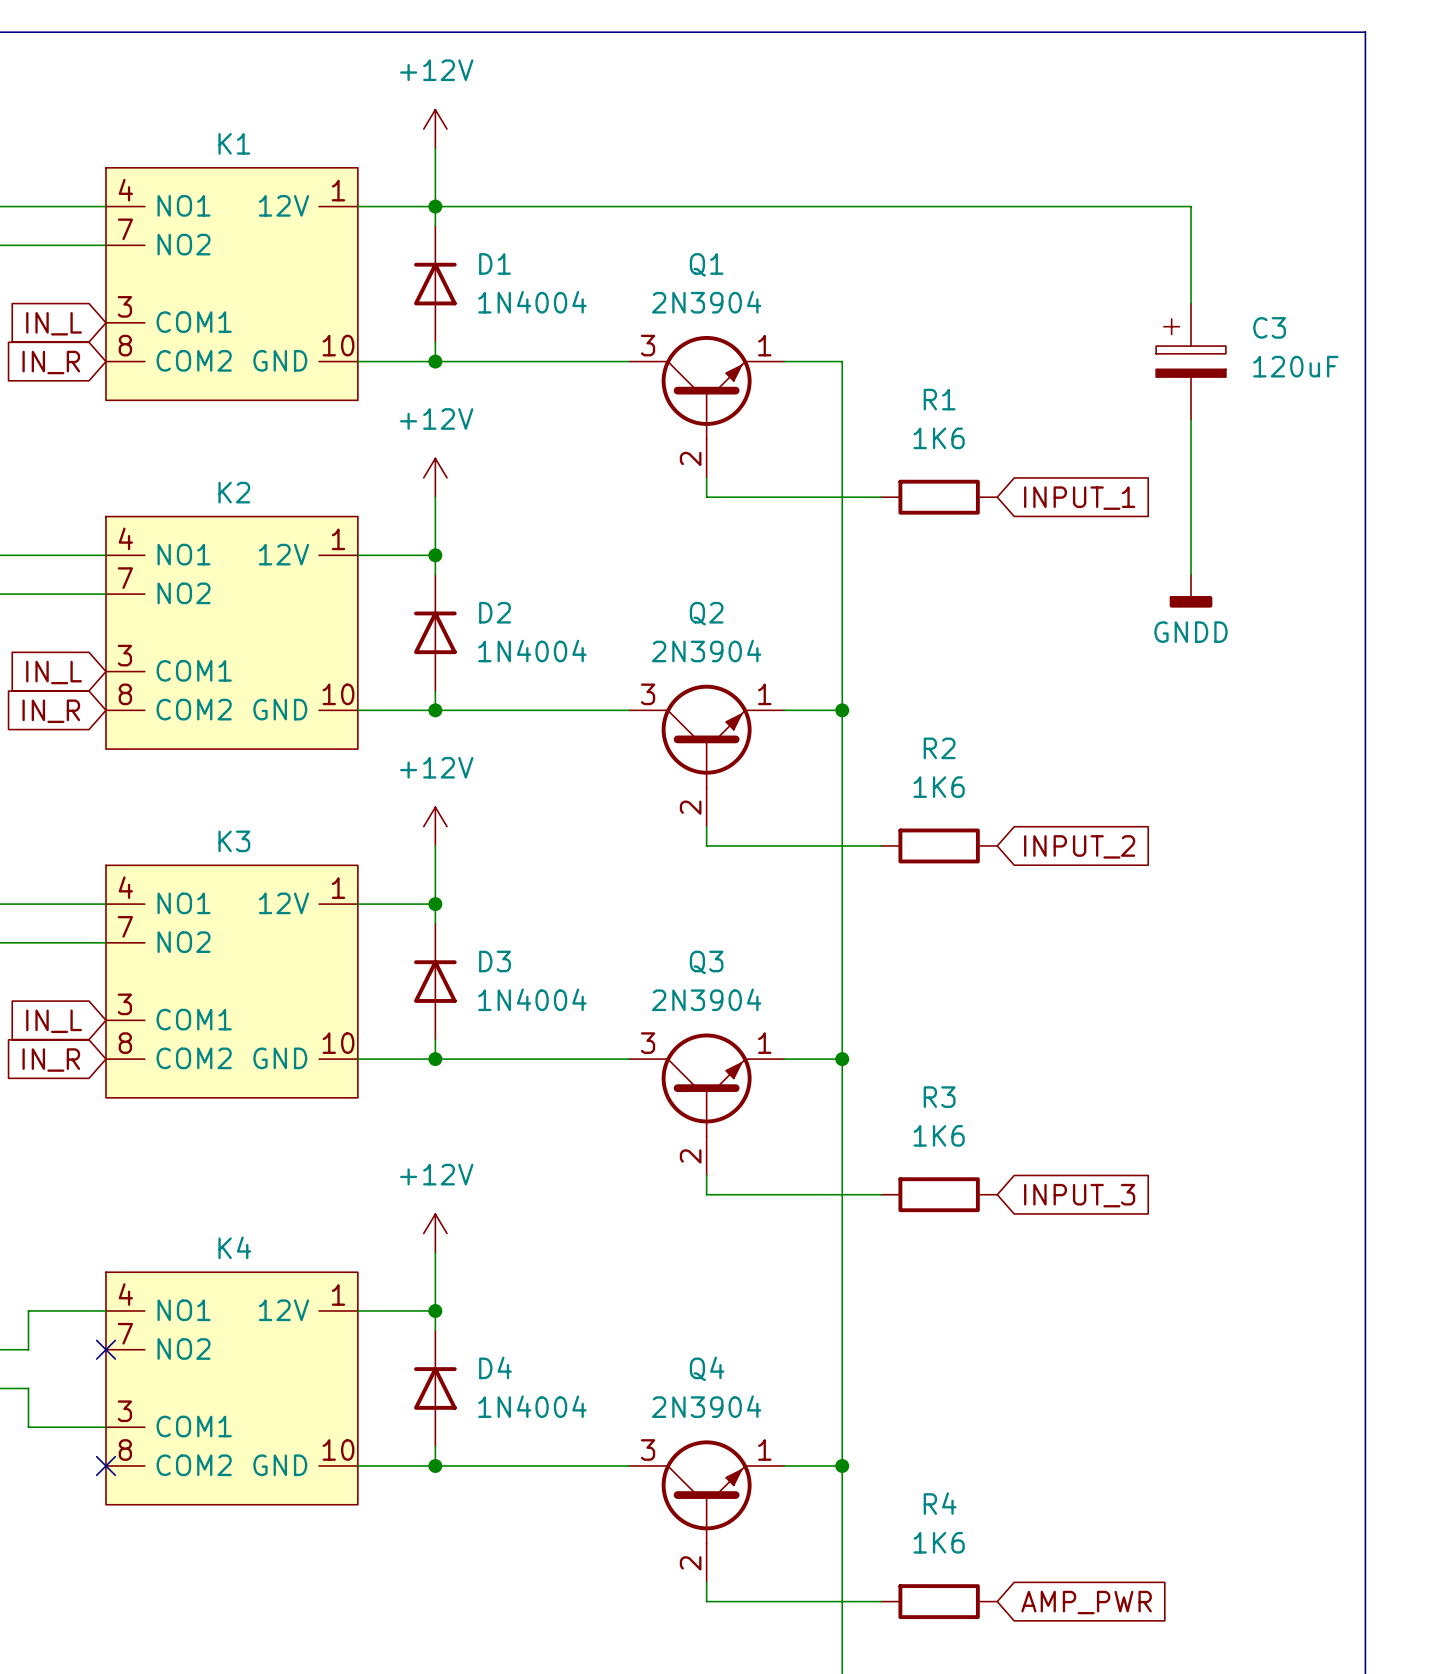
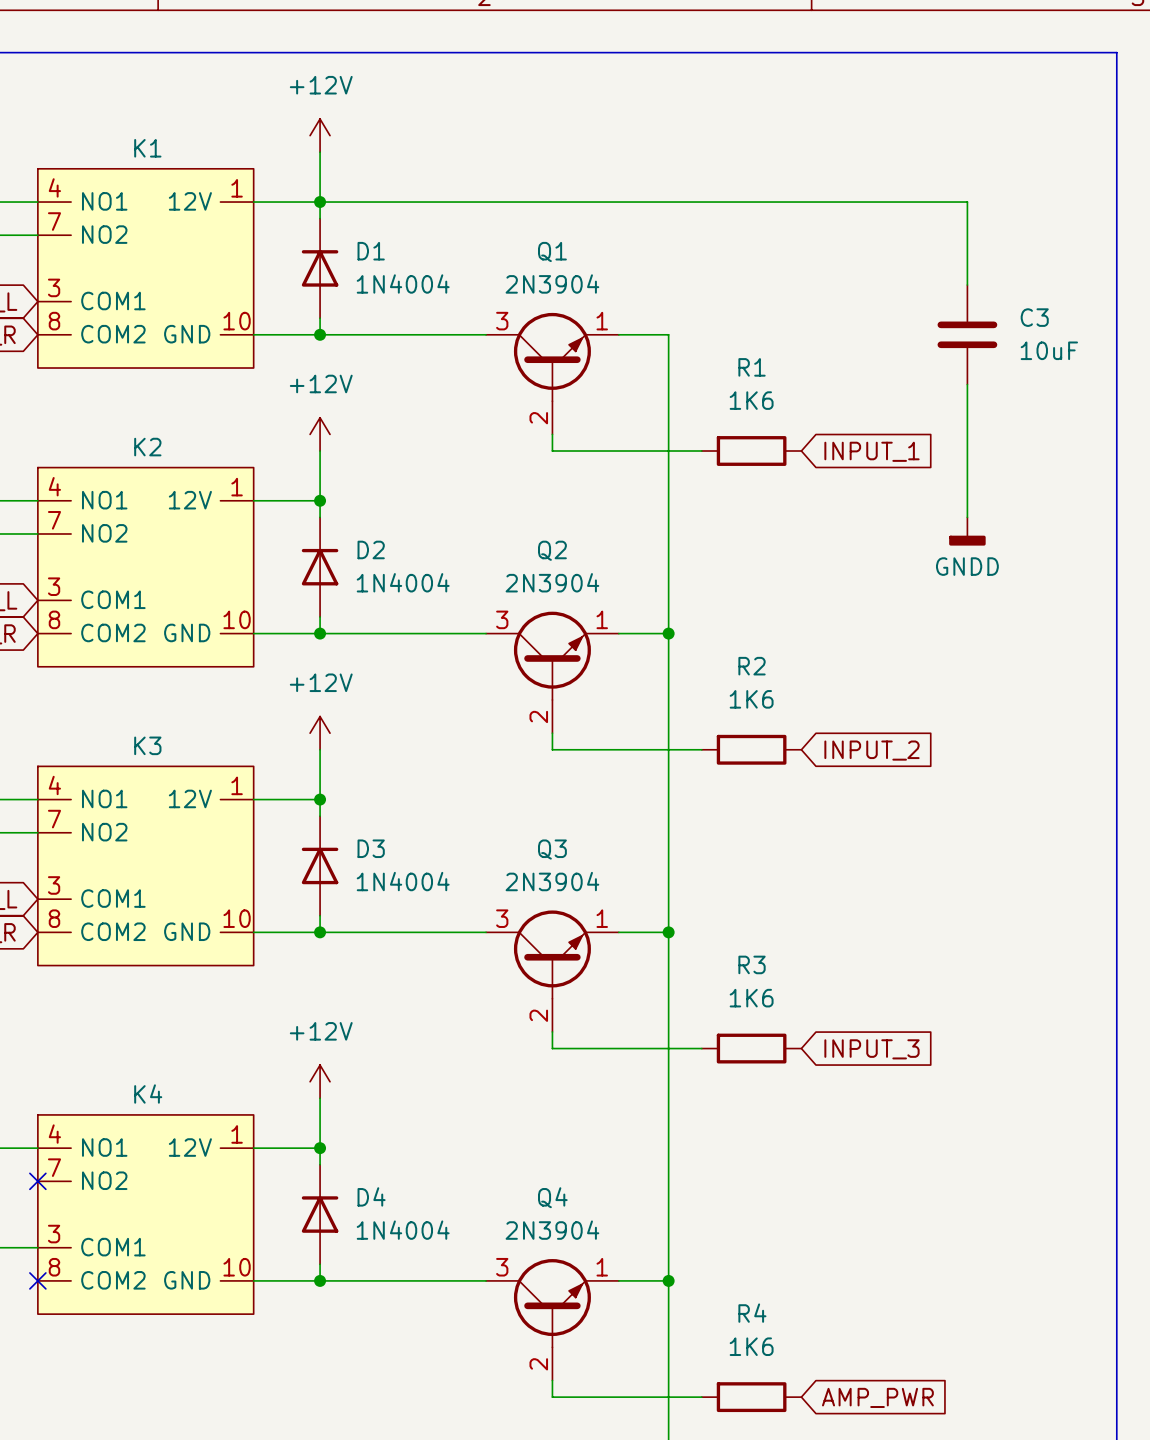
C3 symbol: [1156, 303, 1226, 420] -> [937, 285, 998, 385]
C3 value: 120uF (1295, 366) -> 10uF (1049, 350)

